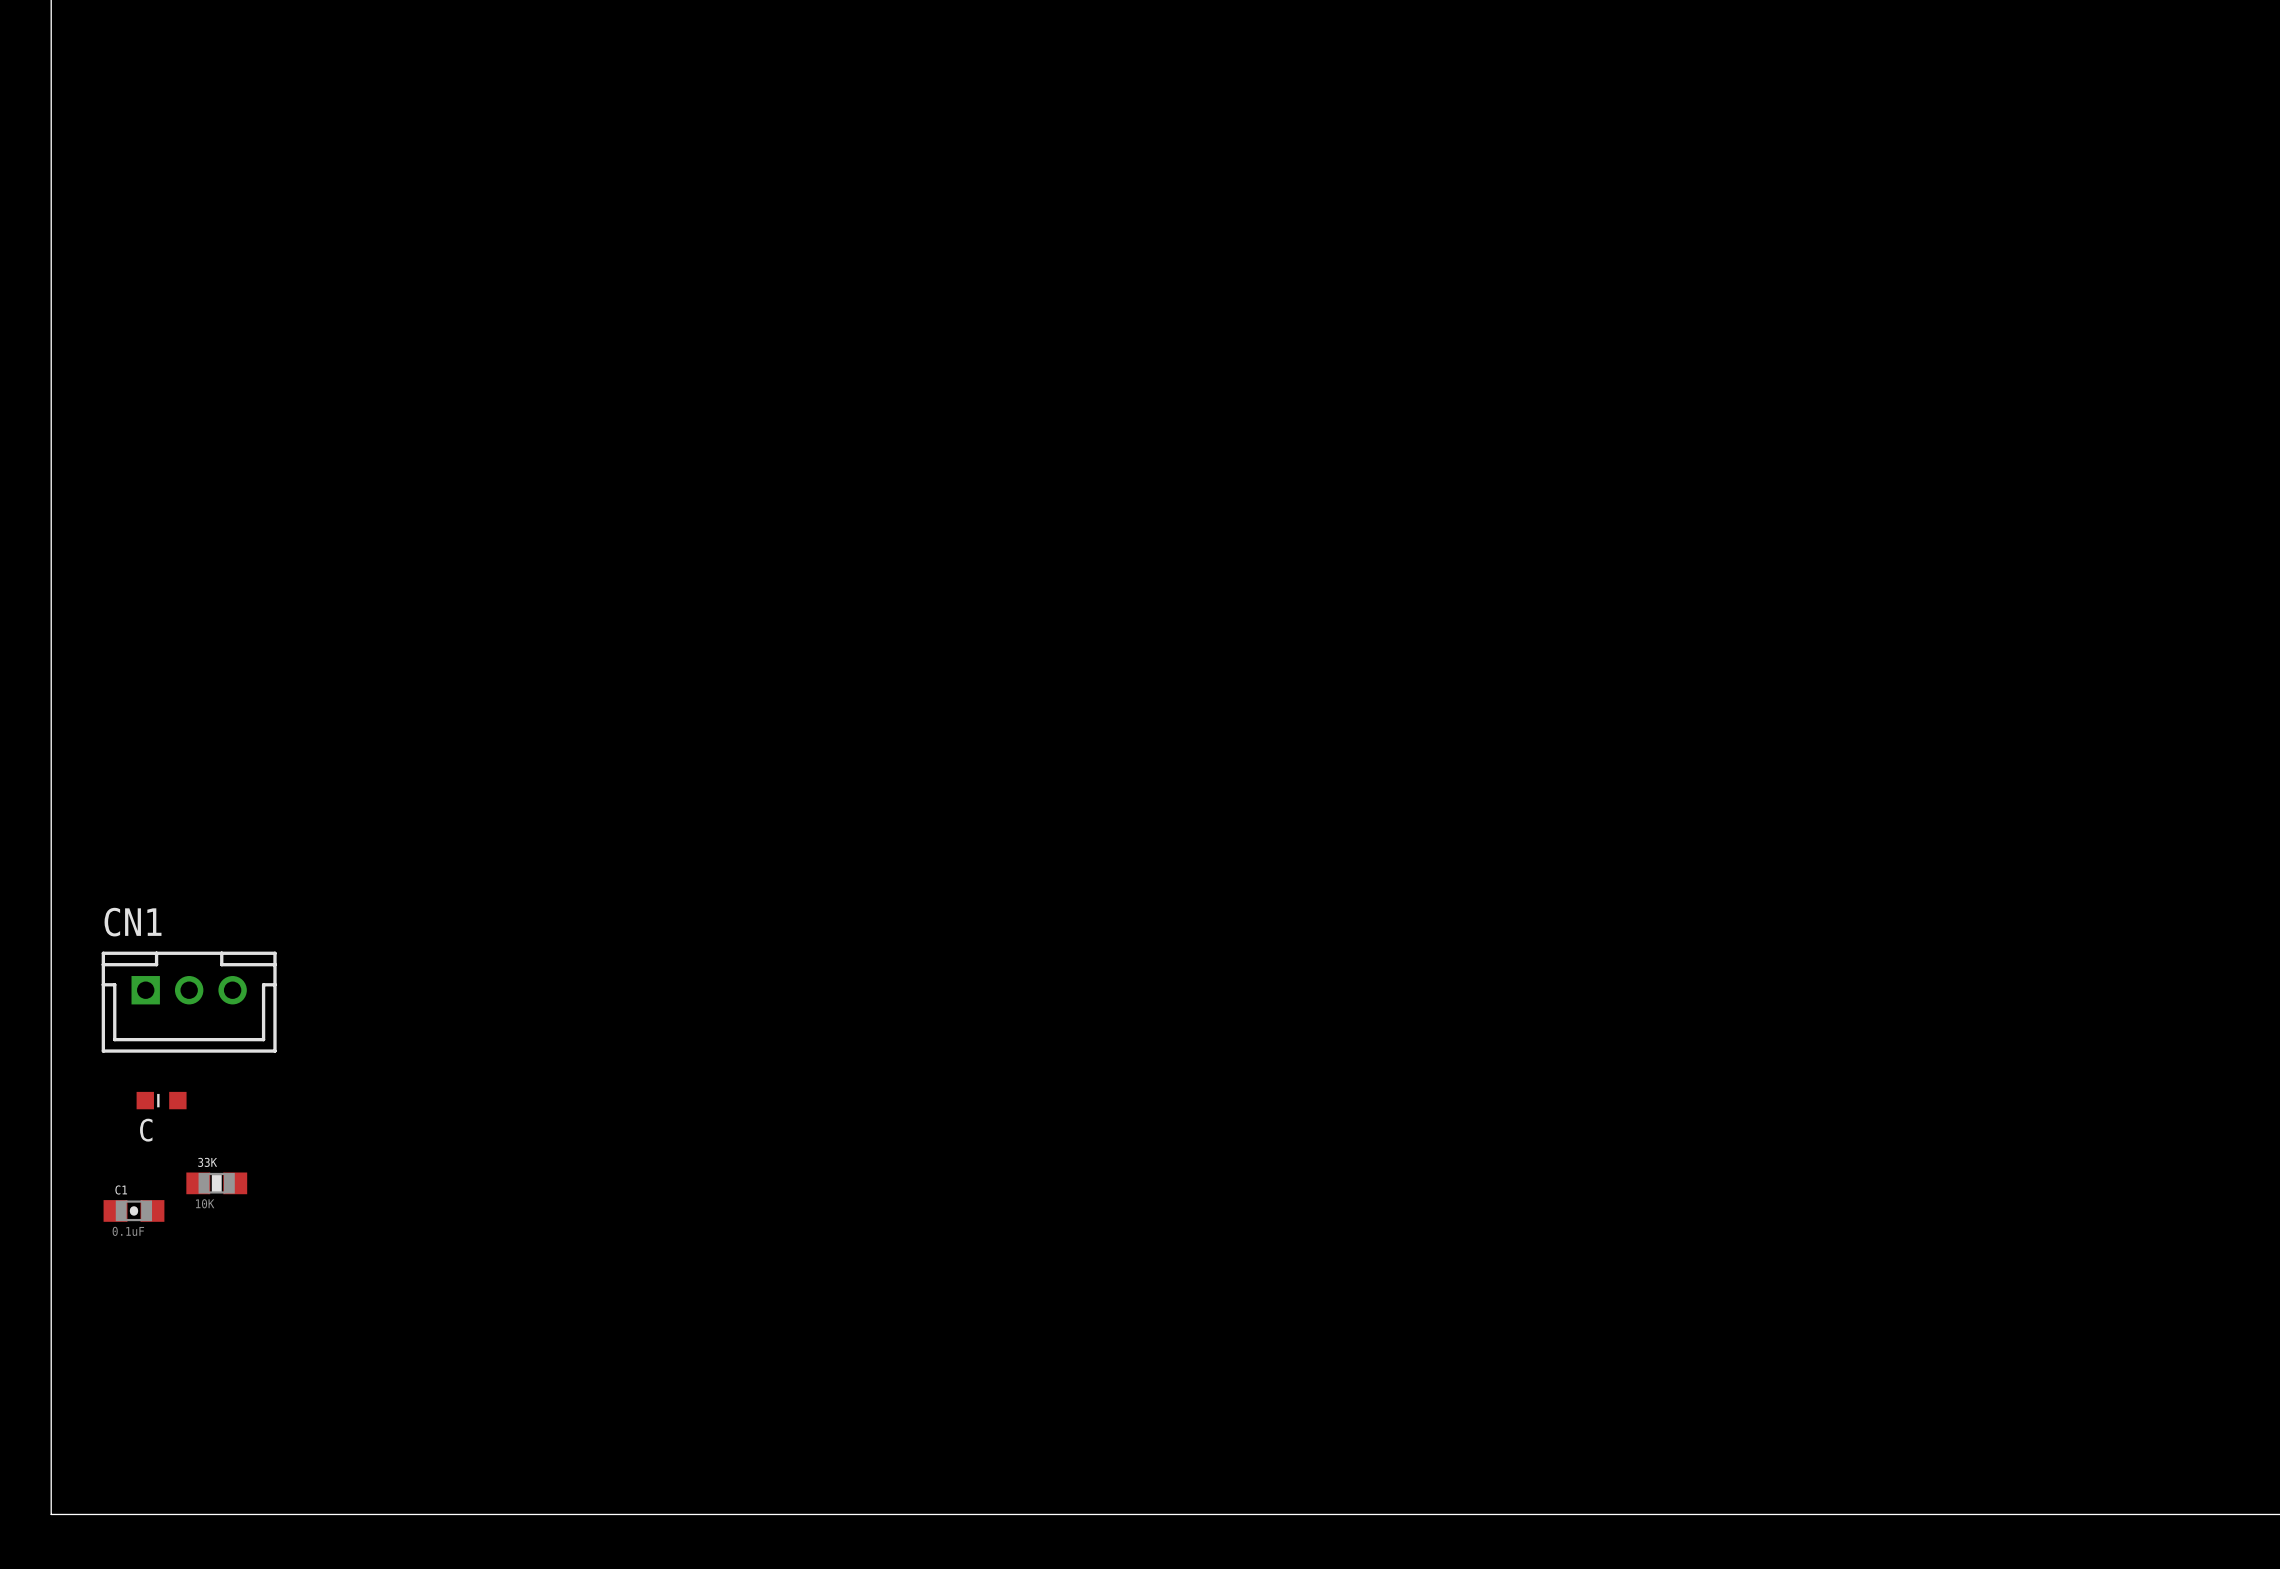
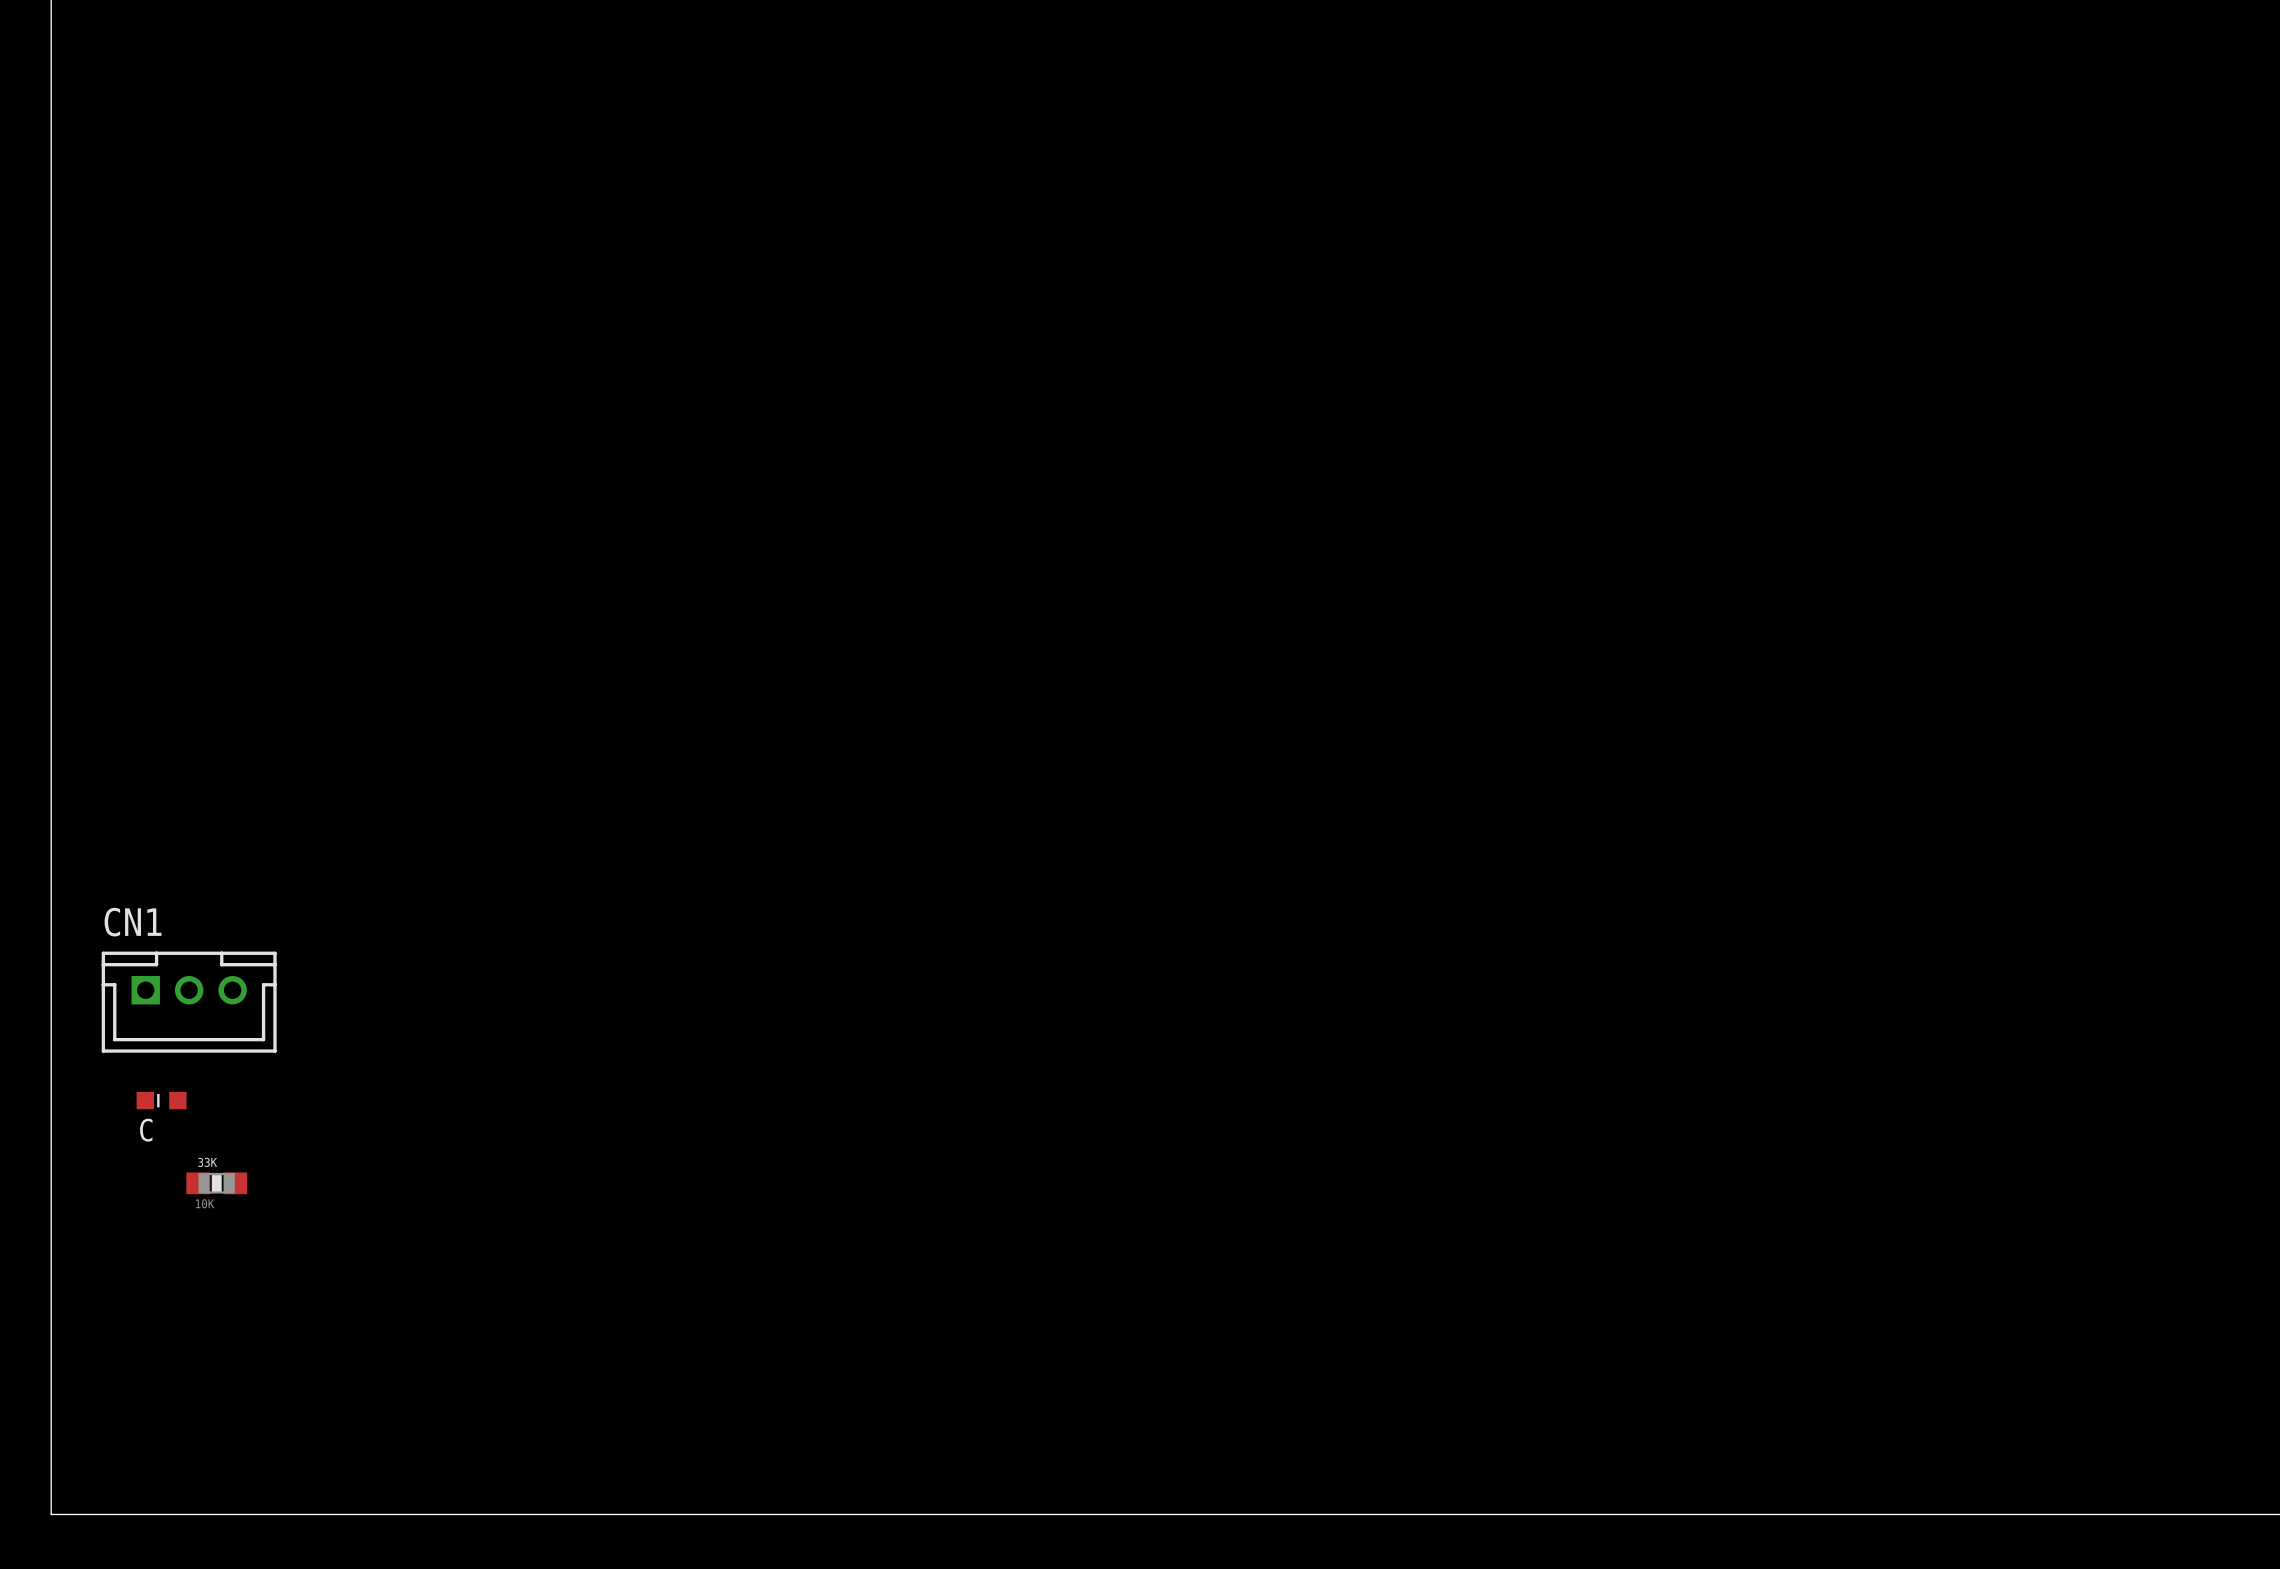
C1: 0.1uF (133, 1210) -> none

